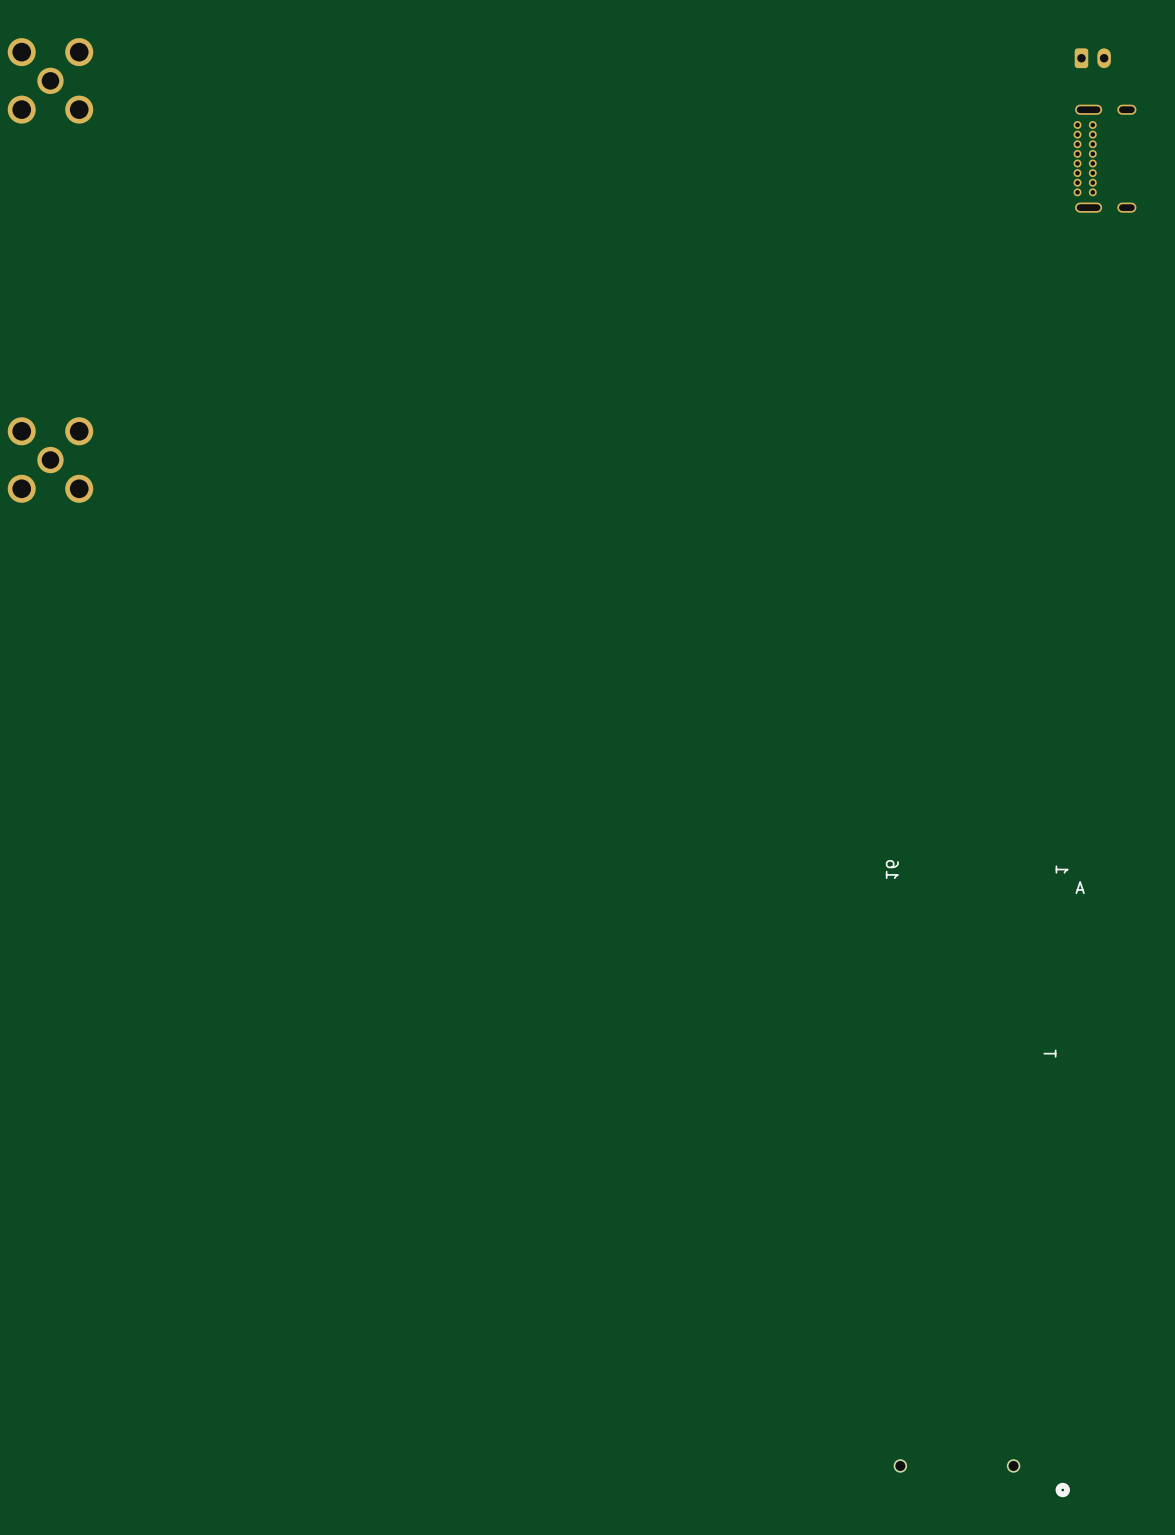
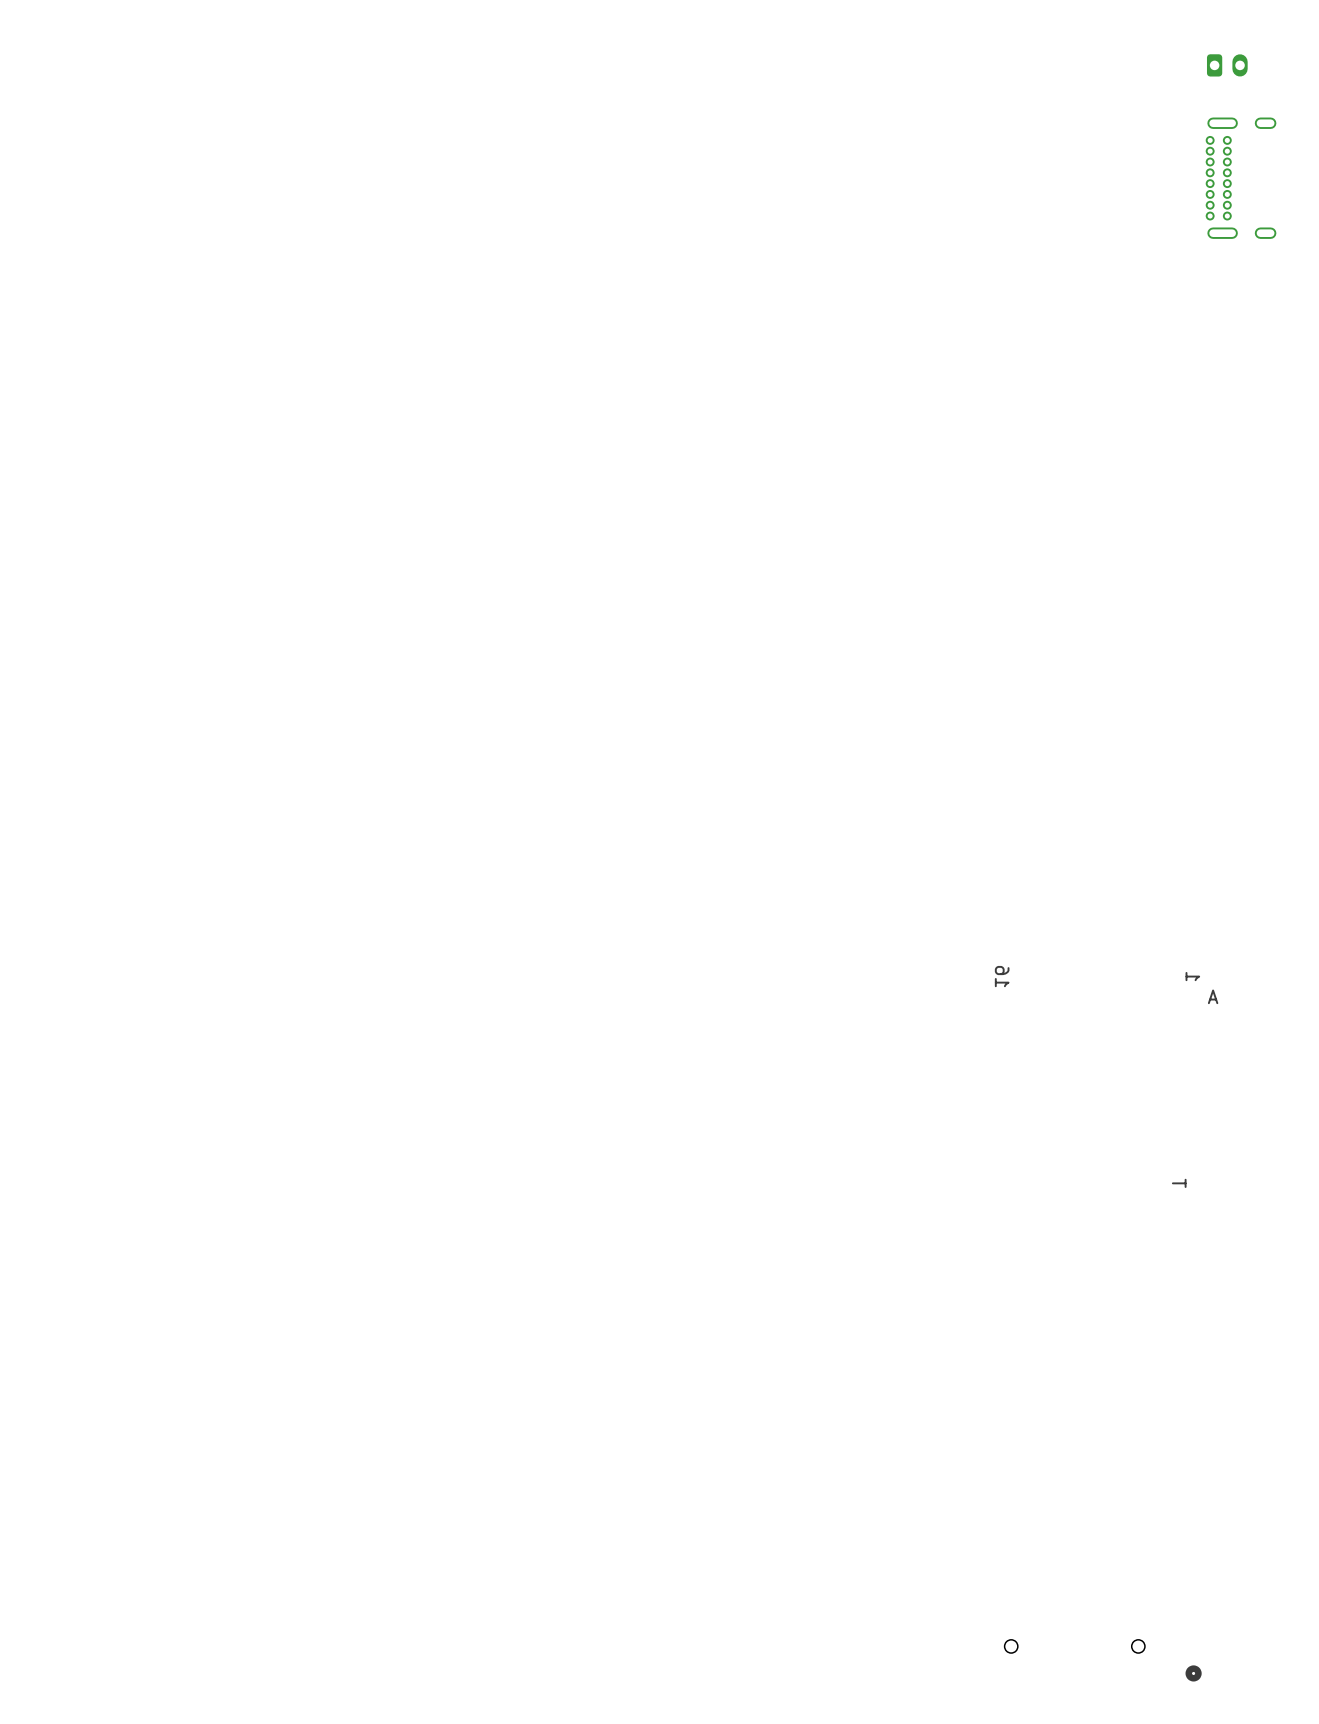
part: (50, 80) -> none
part: (50, 460) -> none

